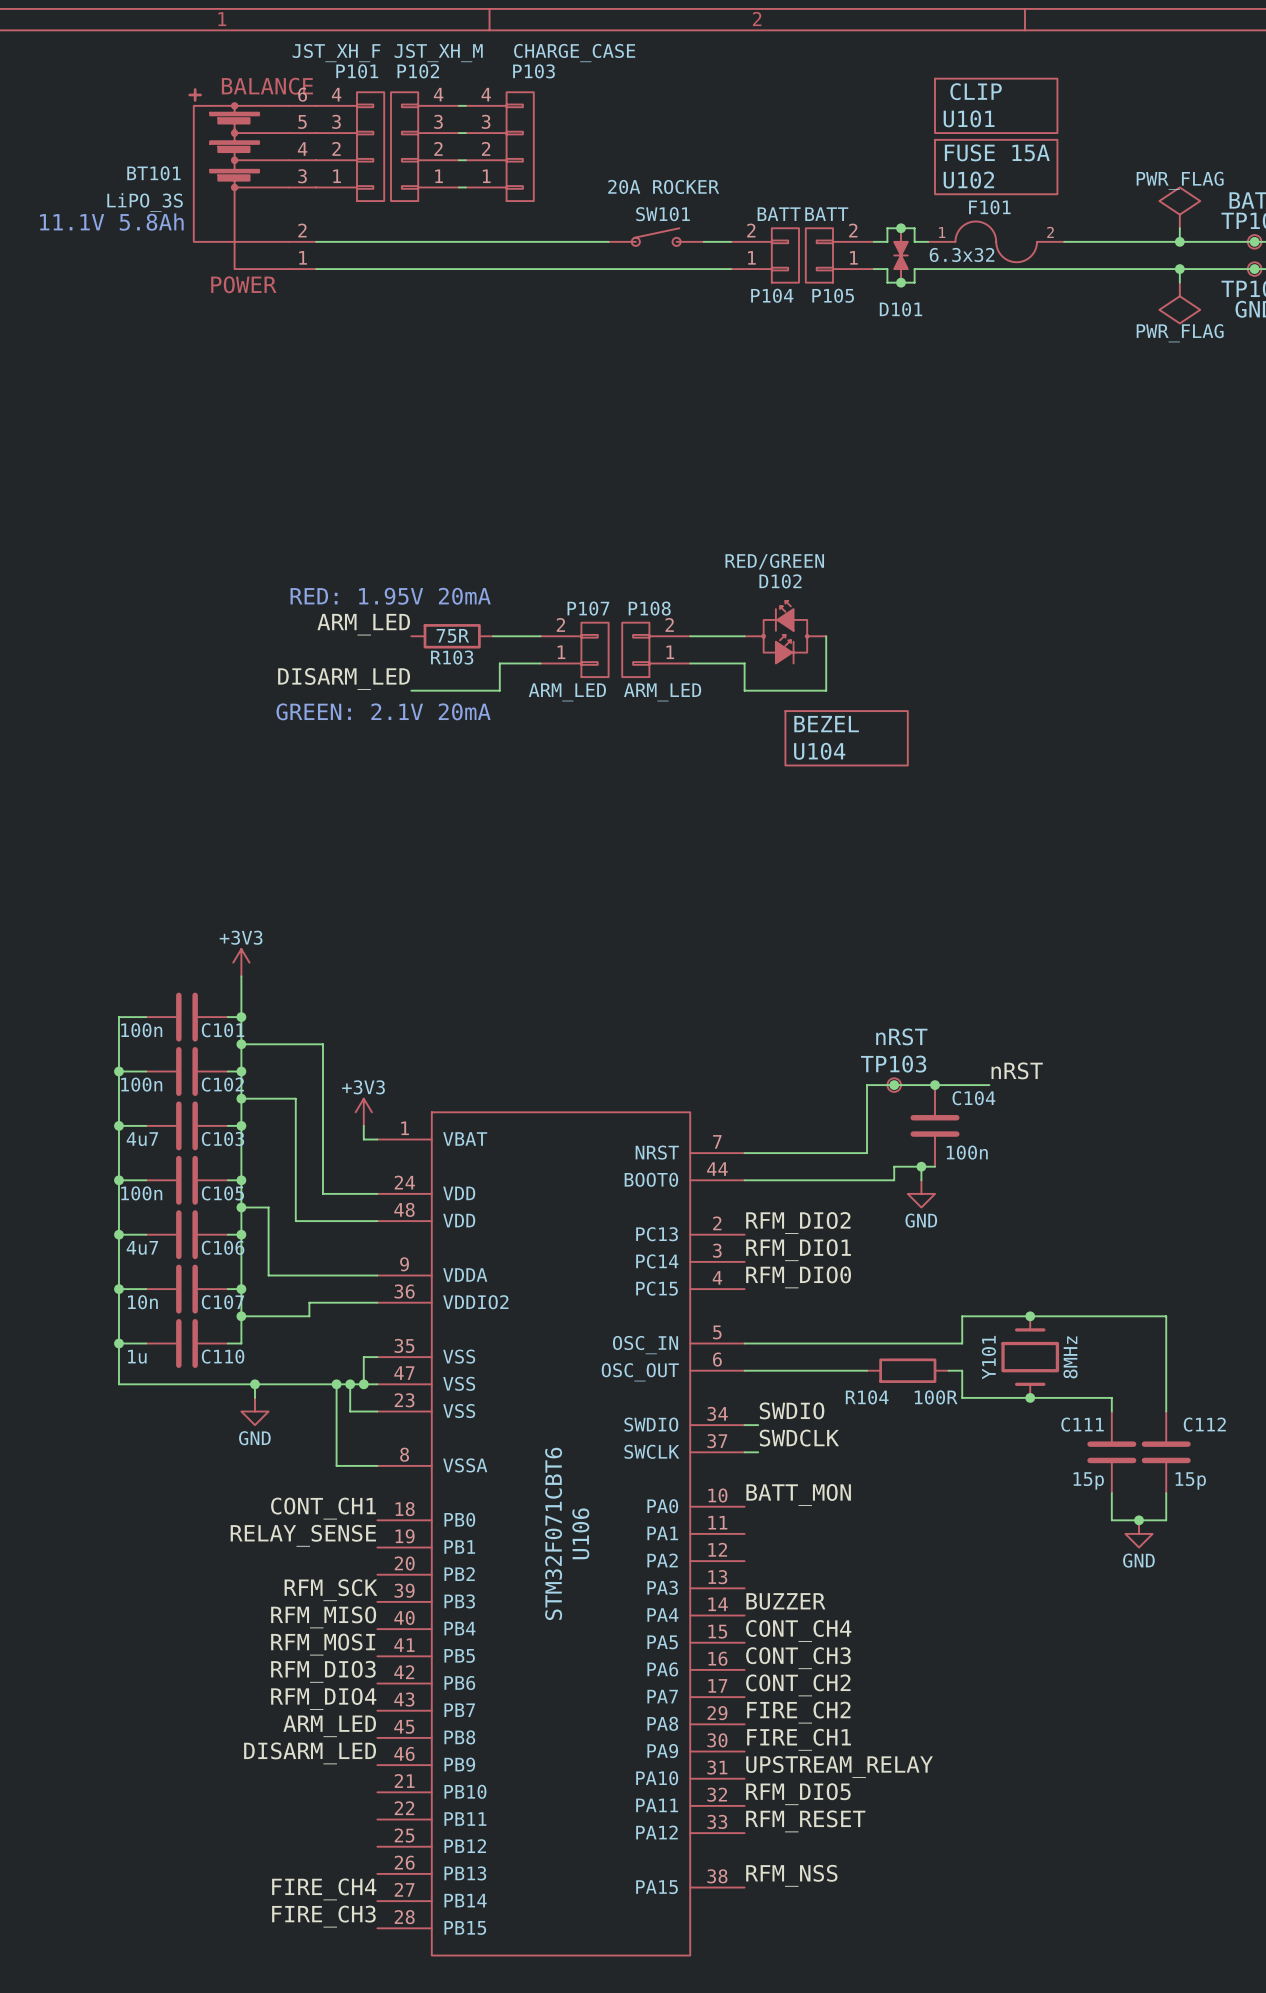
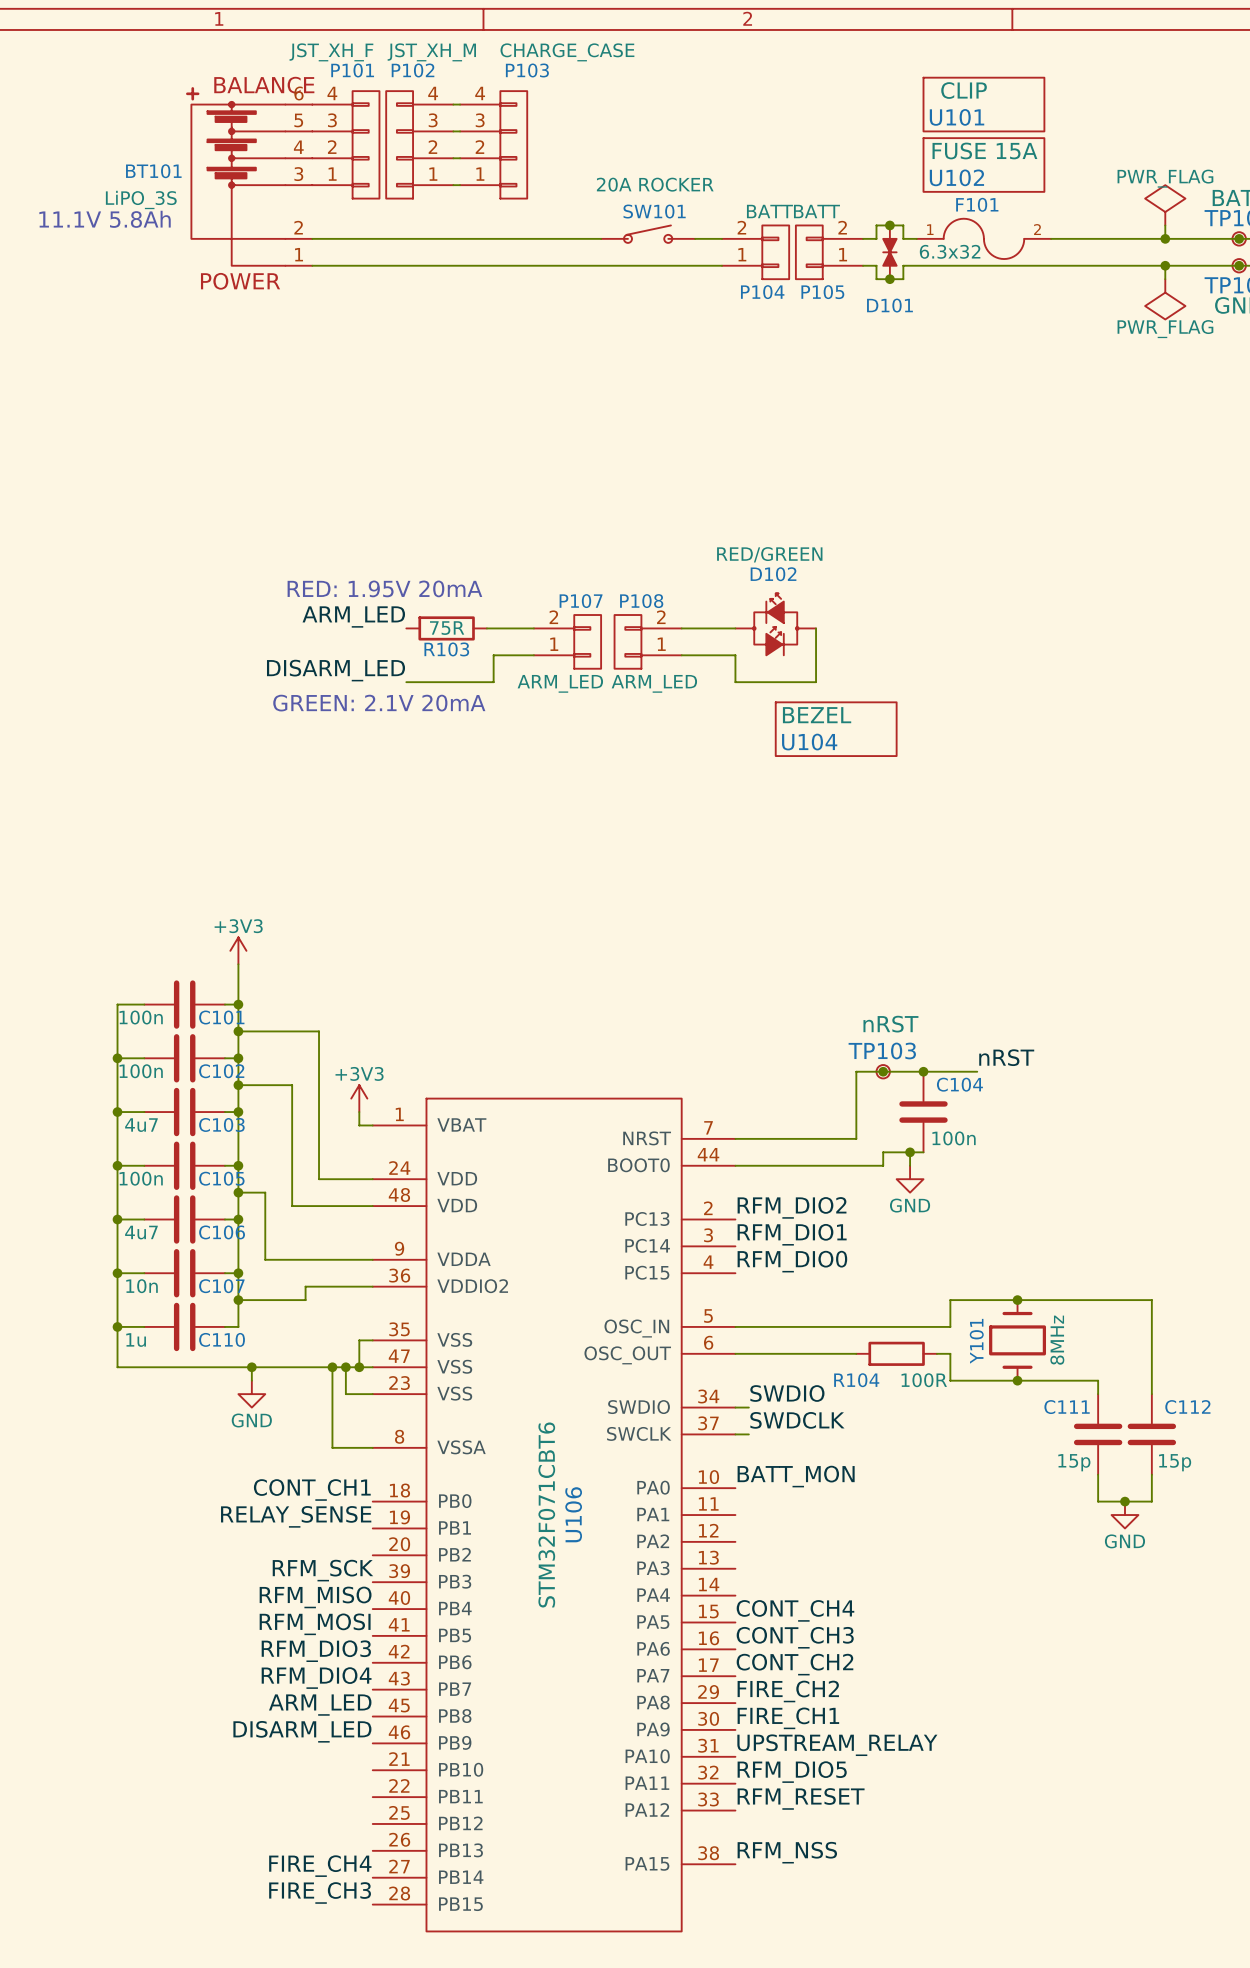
label: BUZZER (785, 1601) -> none

